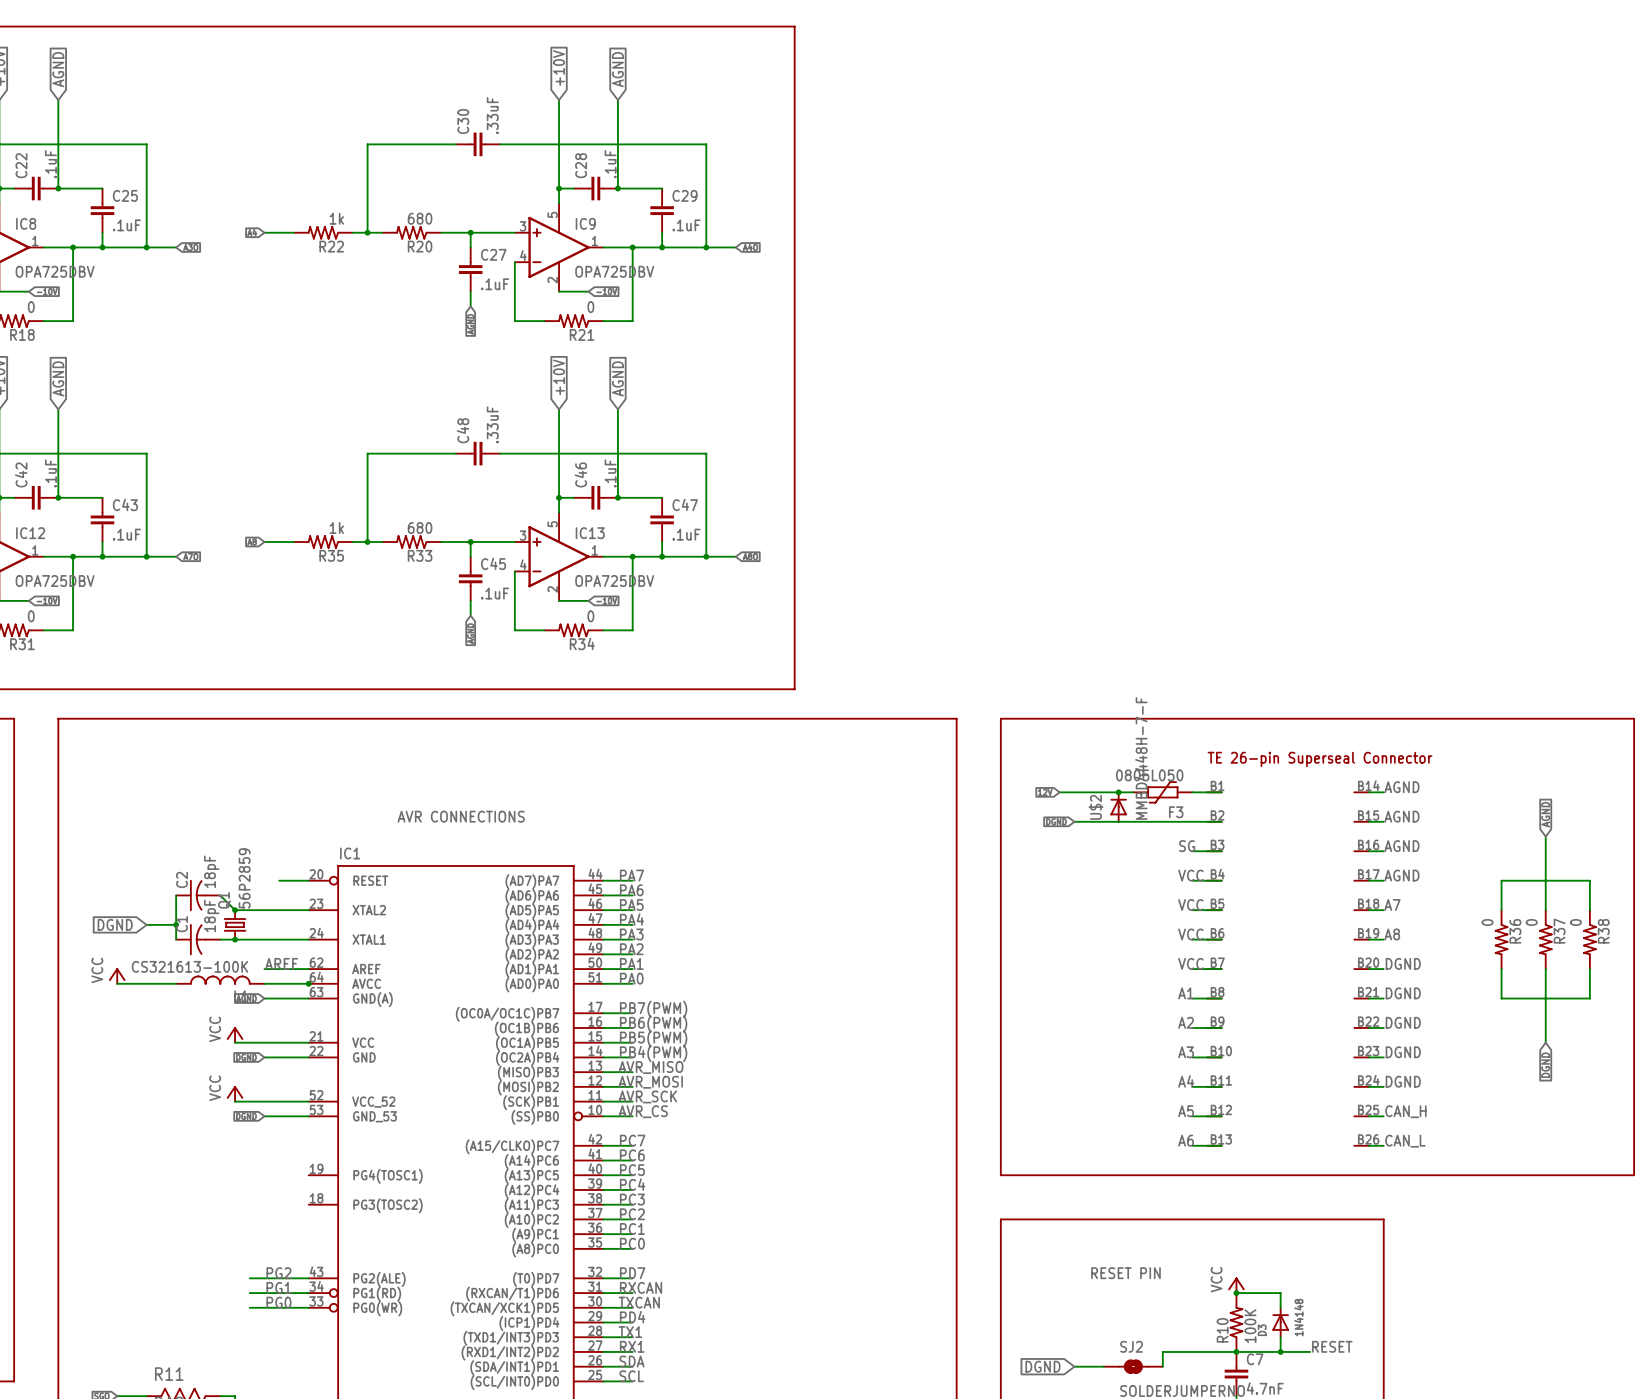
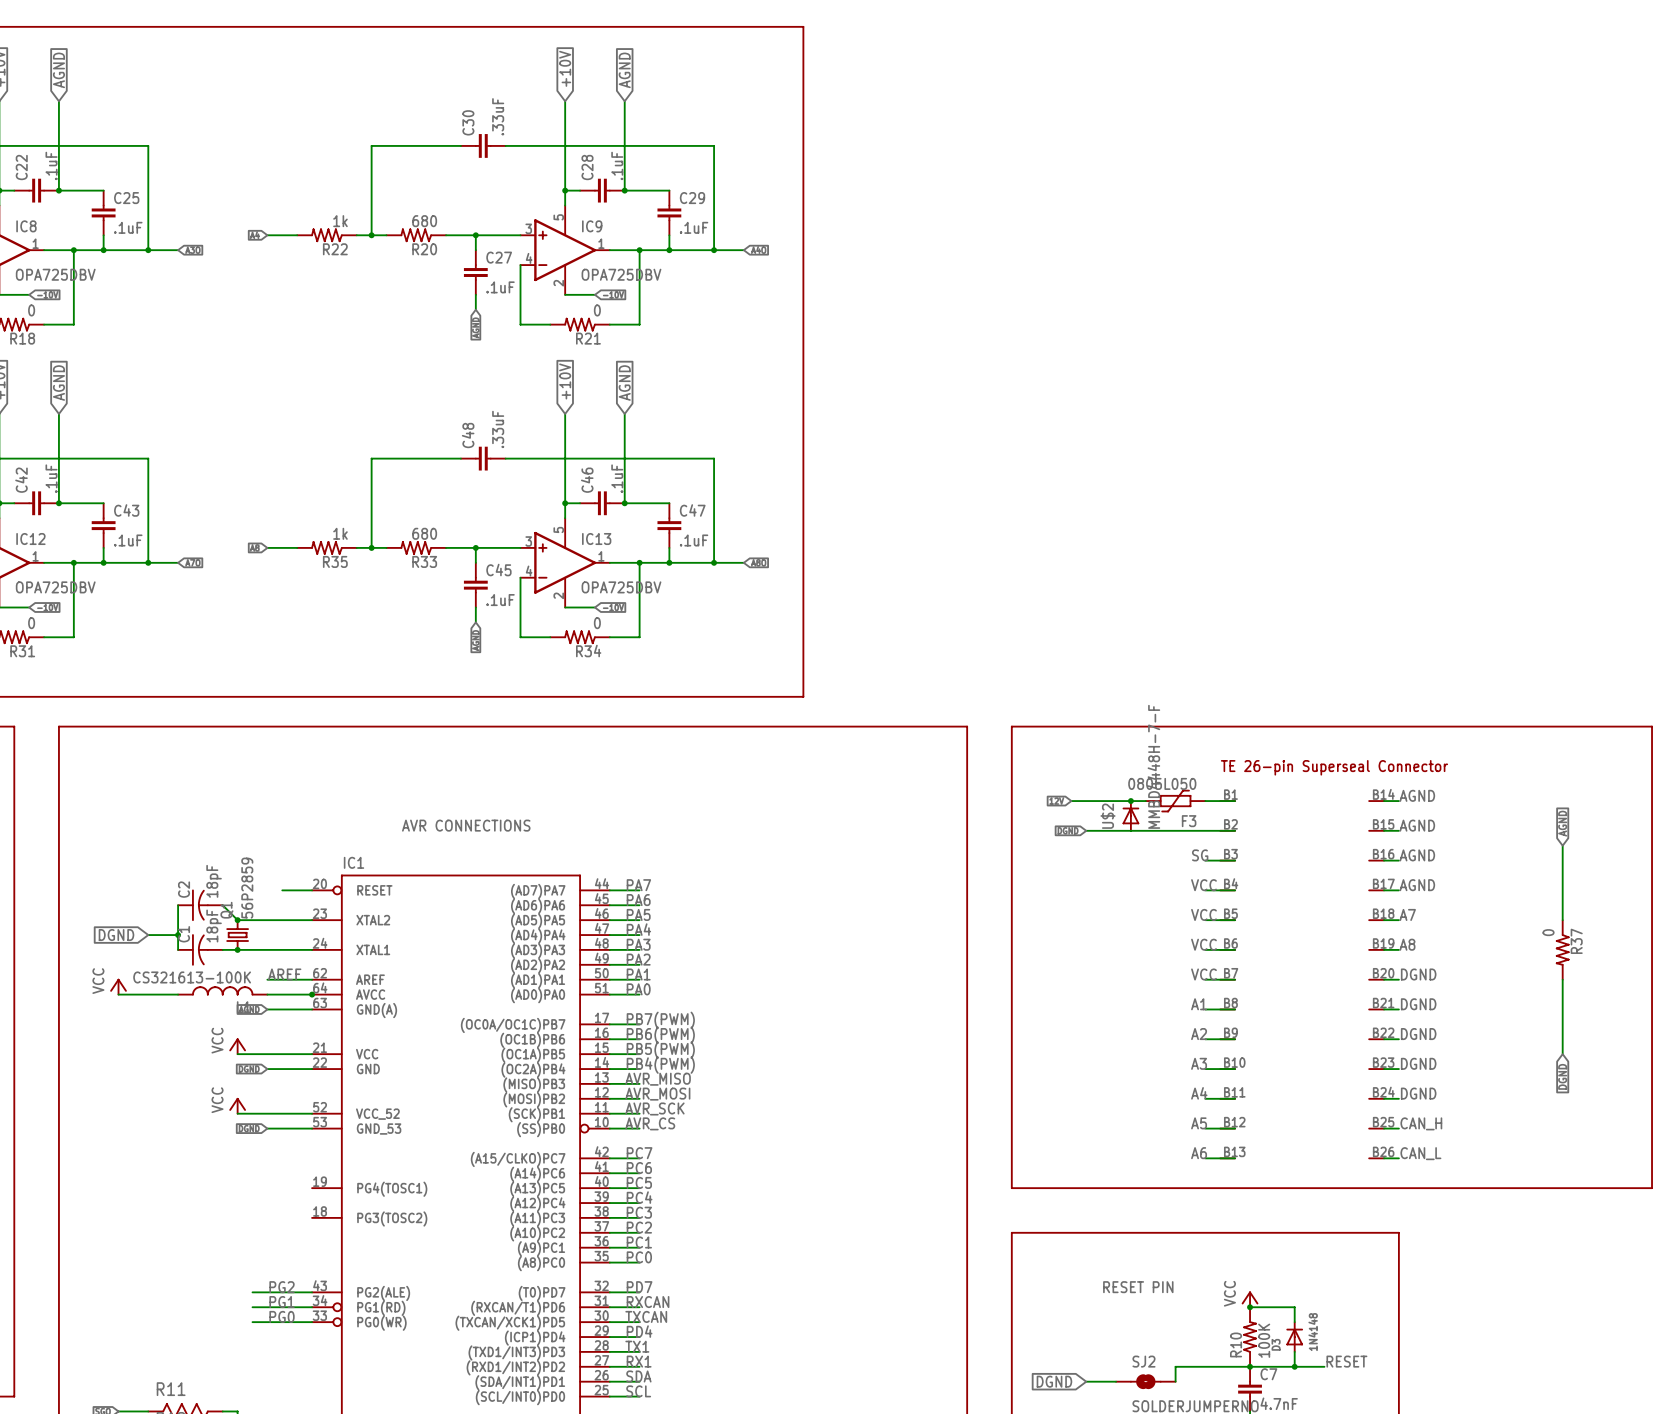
wire: (1501, 910) (1501, 880) (1589, 880) (1589, 910) -> none
R36: 0 (1501, 939) -> none
R38: 0 (1589, 939) -> none
wire: (1501, 969) (1501, 998) (1589, 998) (1589, 969) -> none

